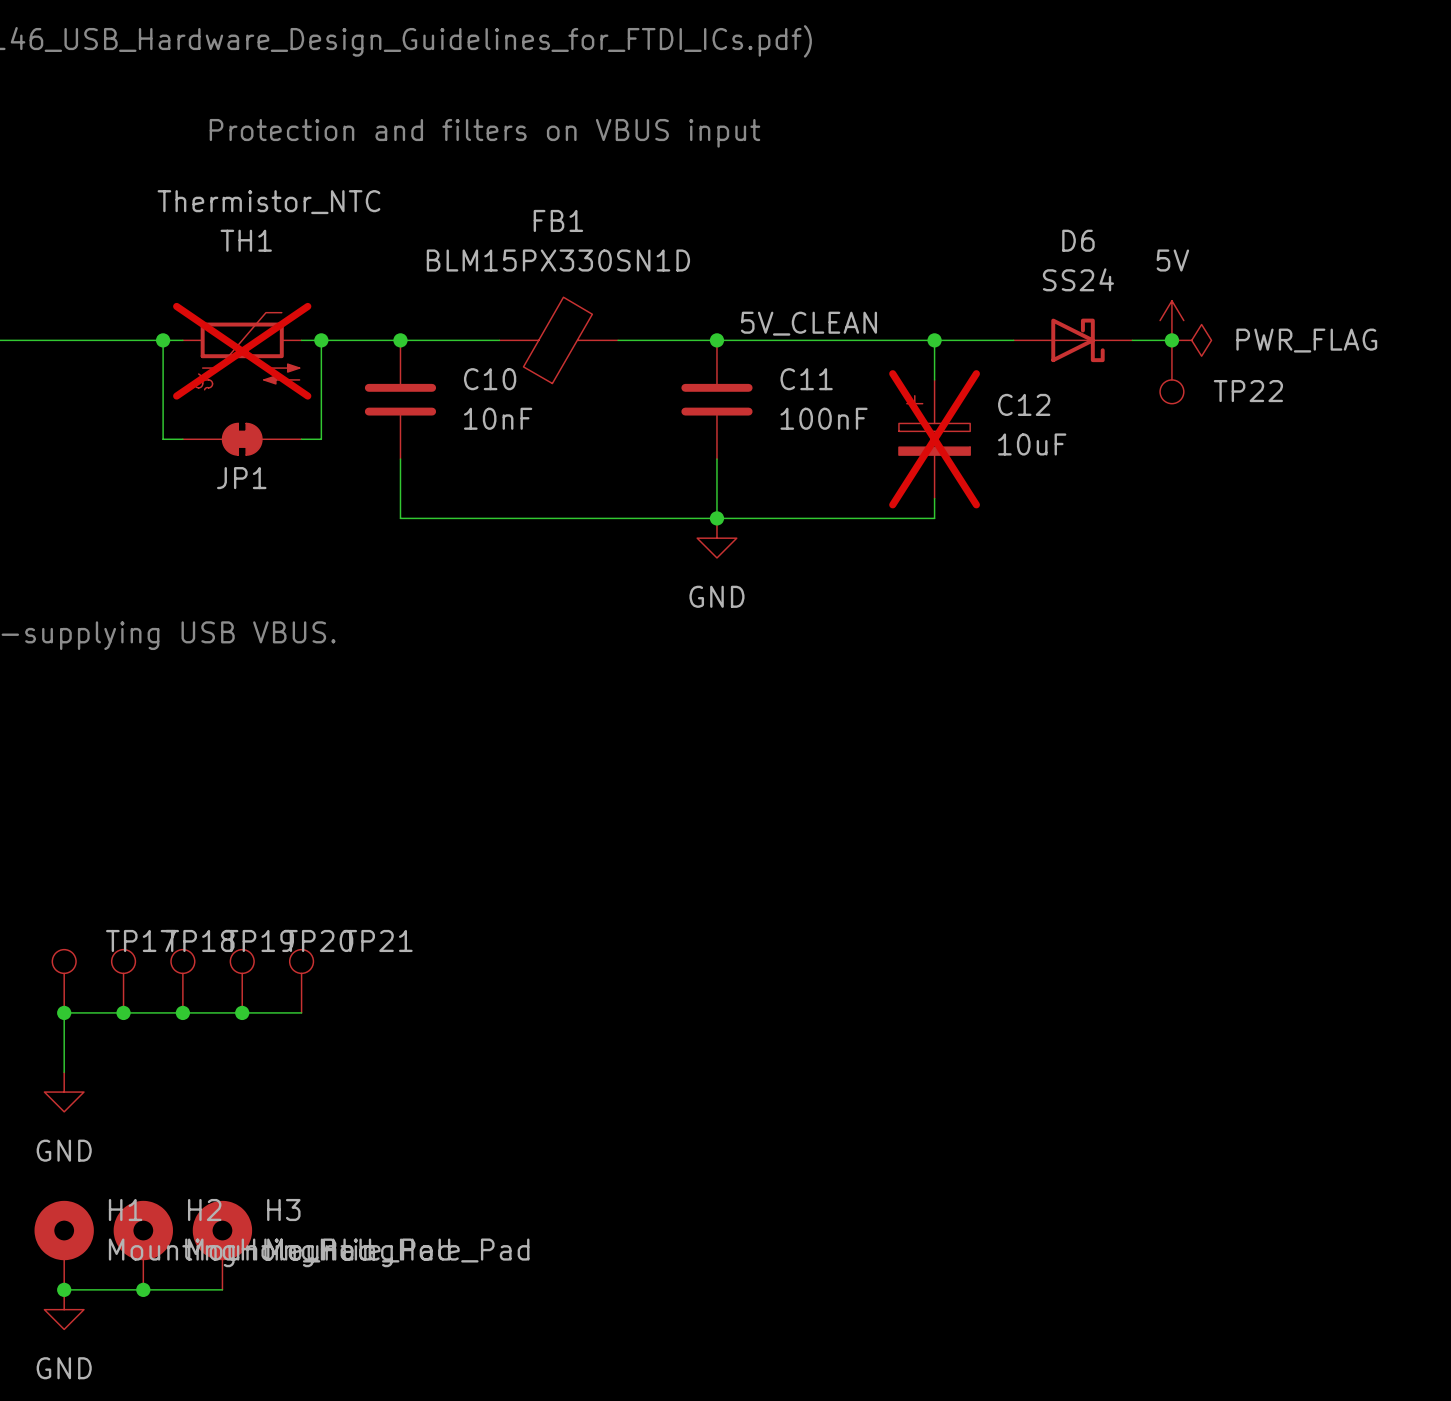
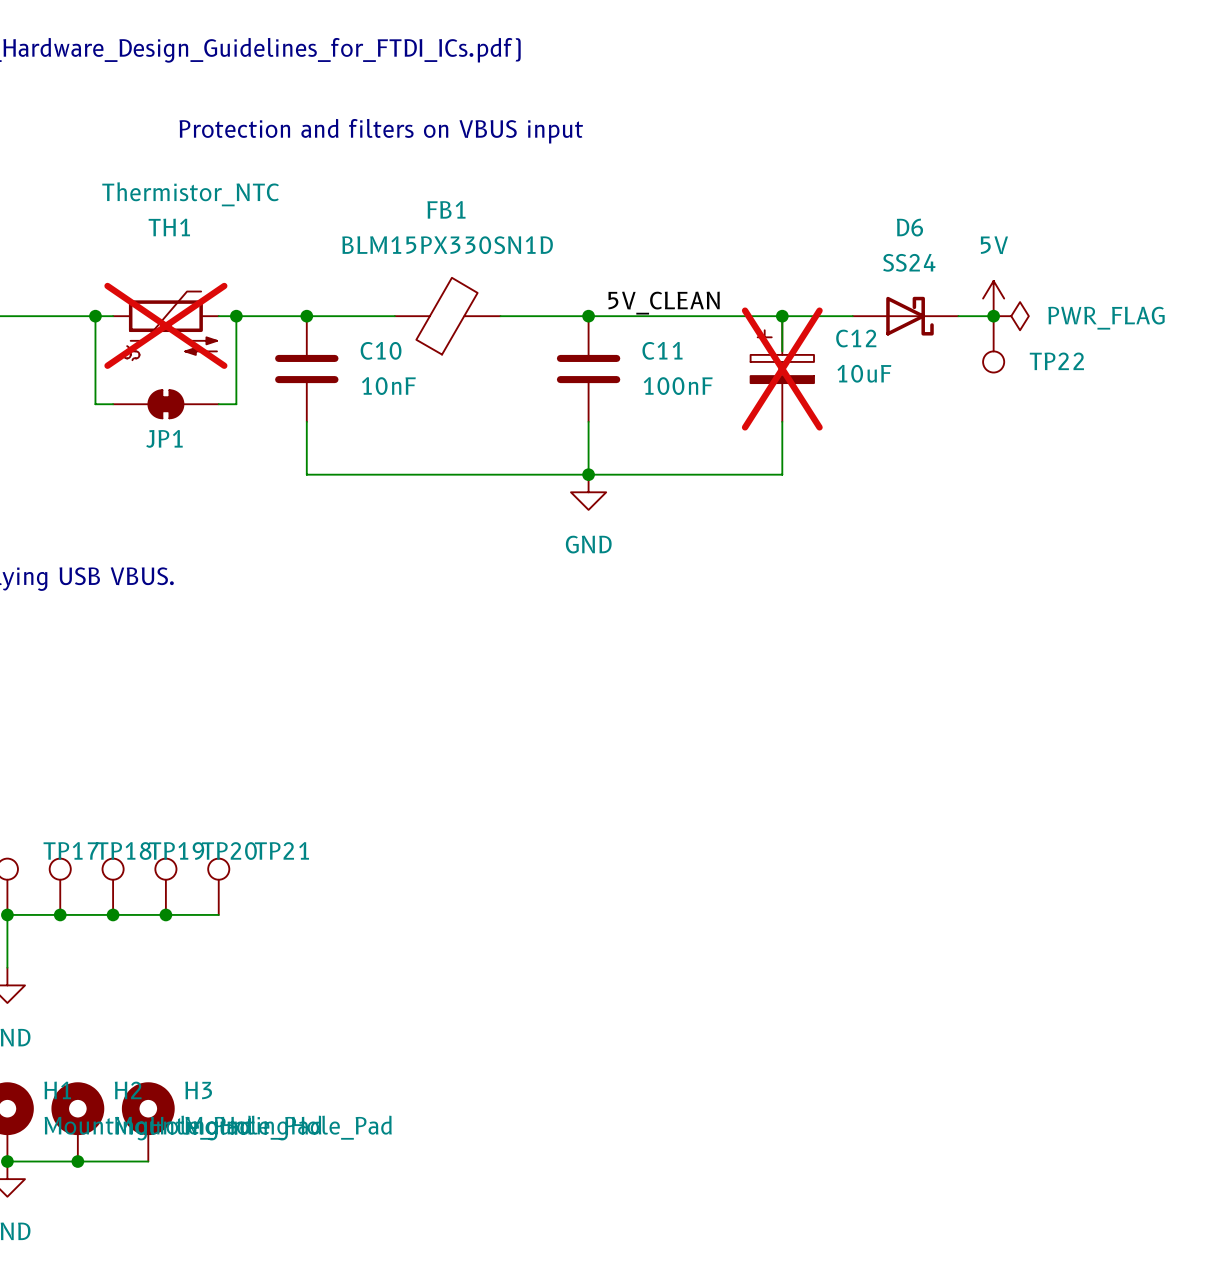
C12 position: (934, 439) -> (782, 369)

